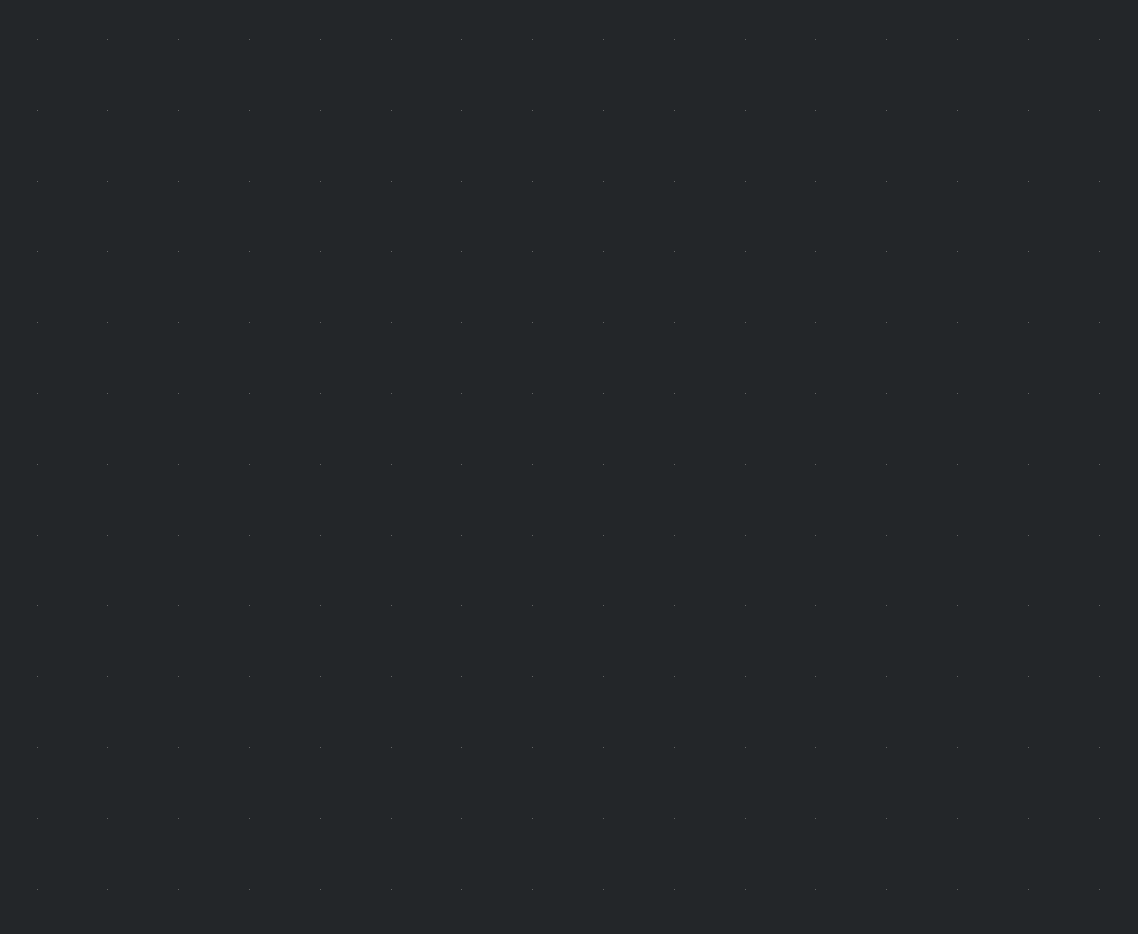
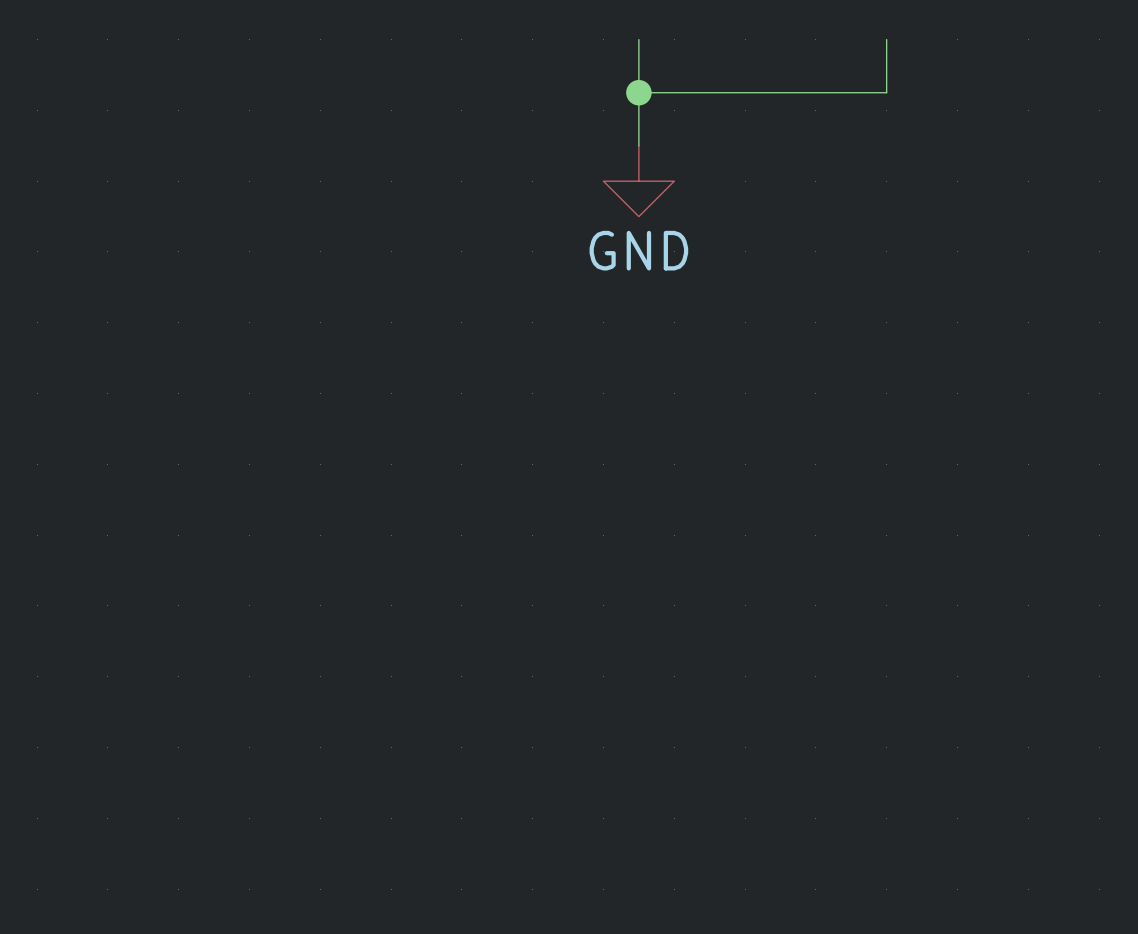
wire: none -> (638, 39) (638, 145)
wire: none -> (886, 39) (886, 92) (638, 92)
junction: none -> (638, 92)
power symbol: none -> GND (638, 181)

